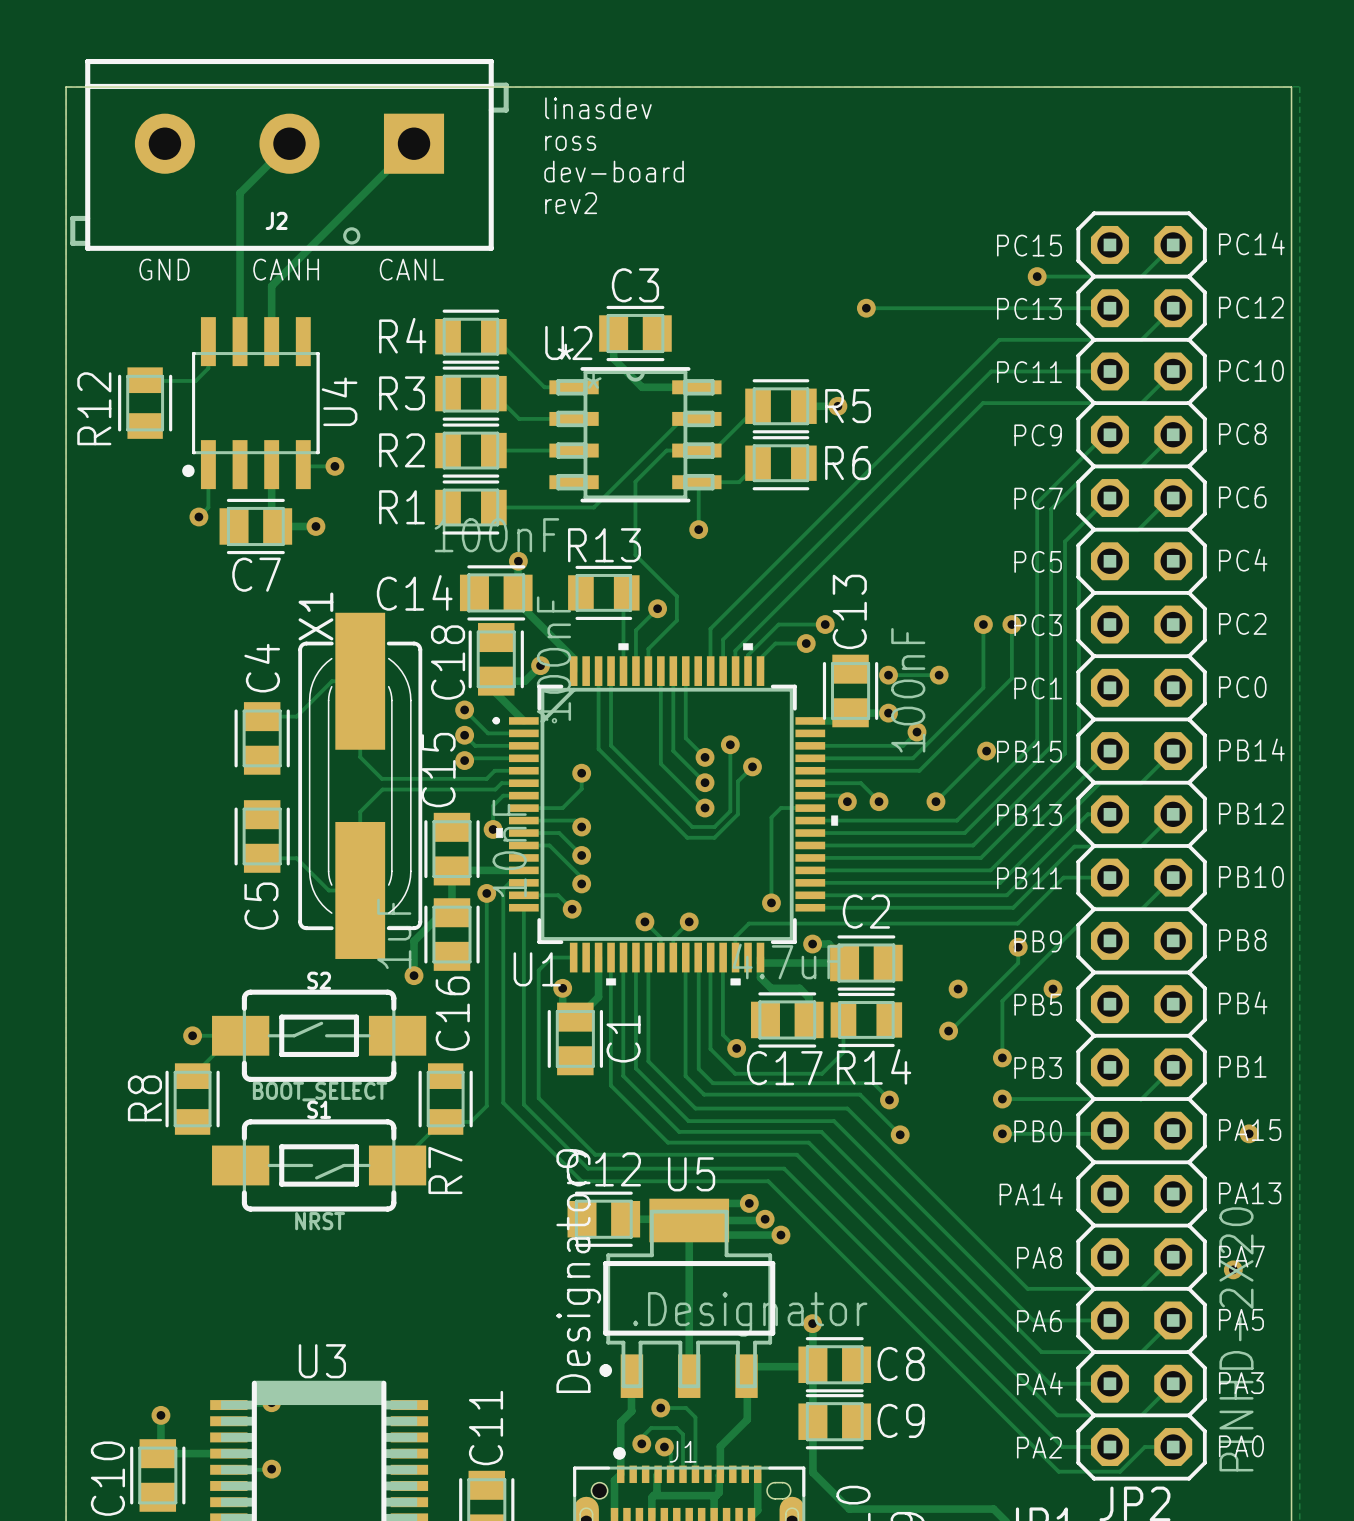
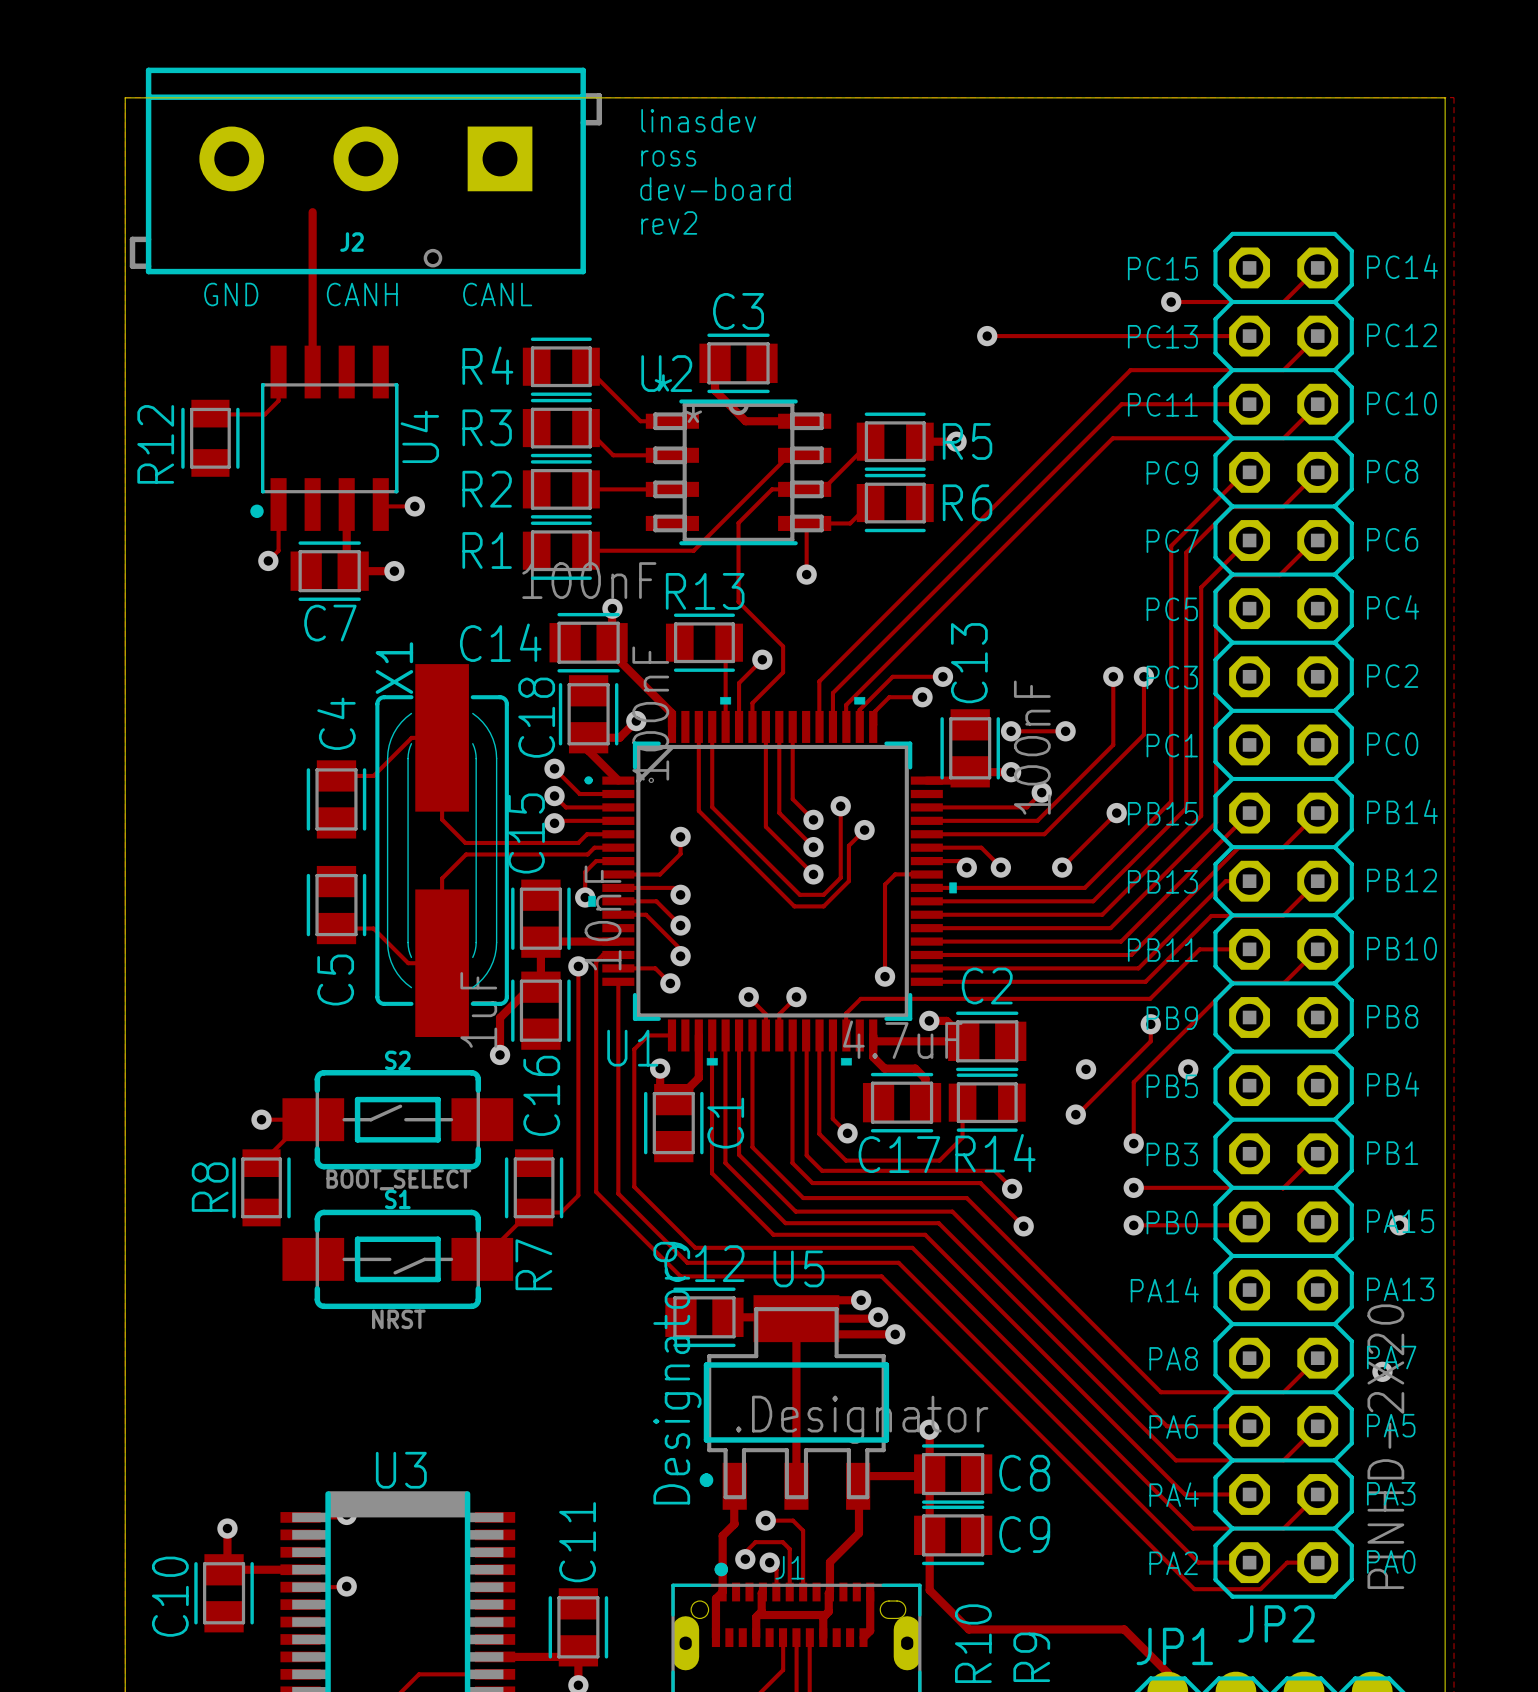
track: (289, 143) (240, 193) -> none
track: (414, 143) (271, 286) (271, 341) -> none

